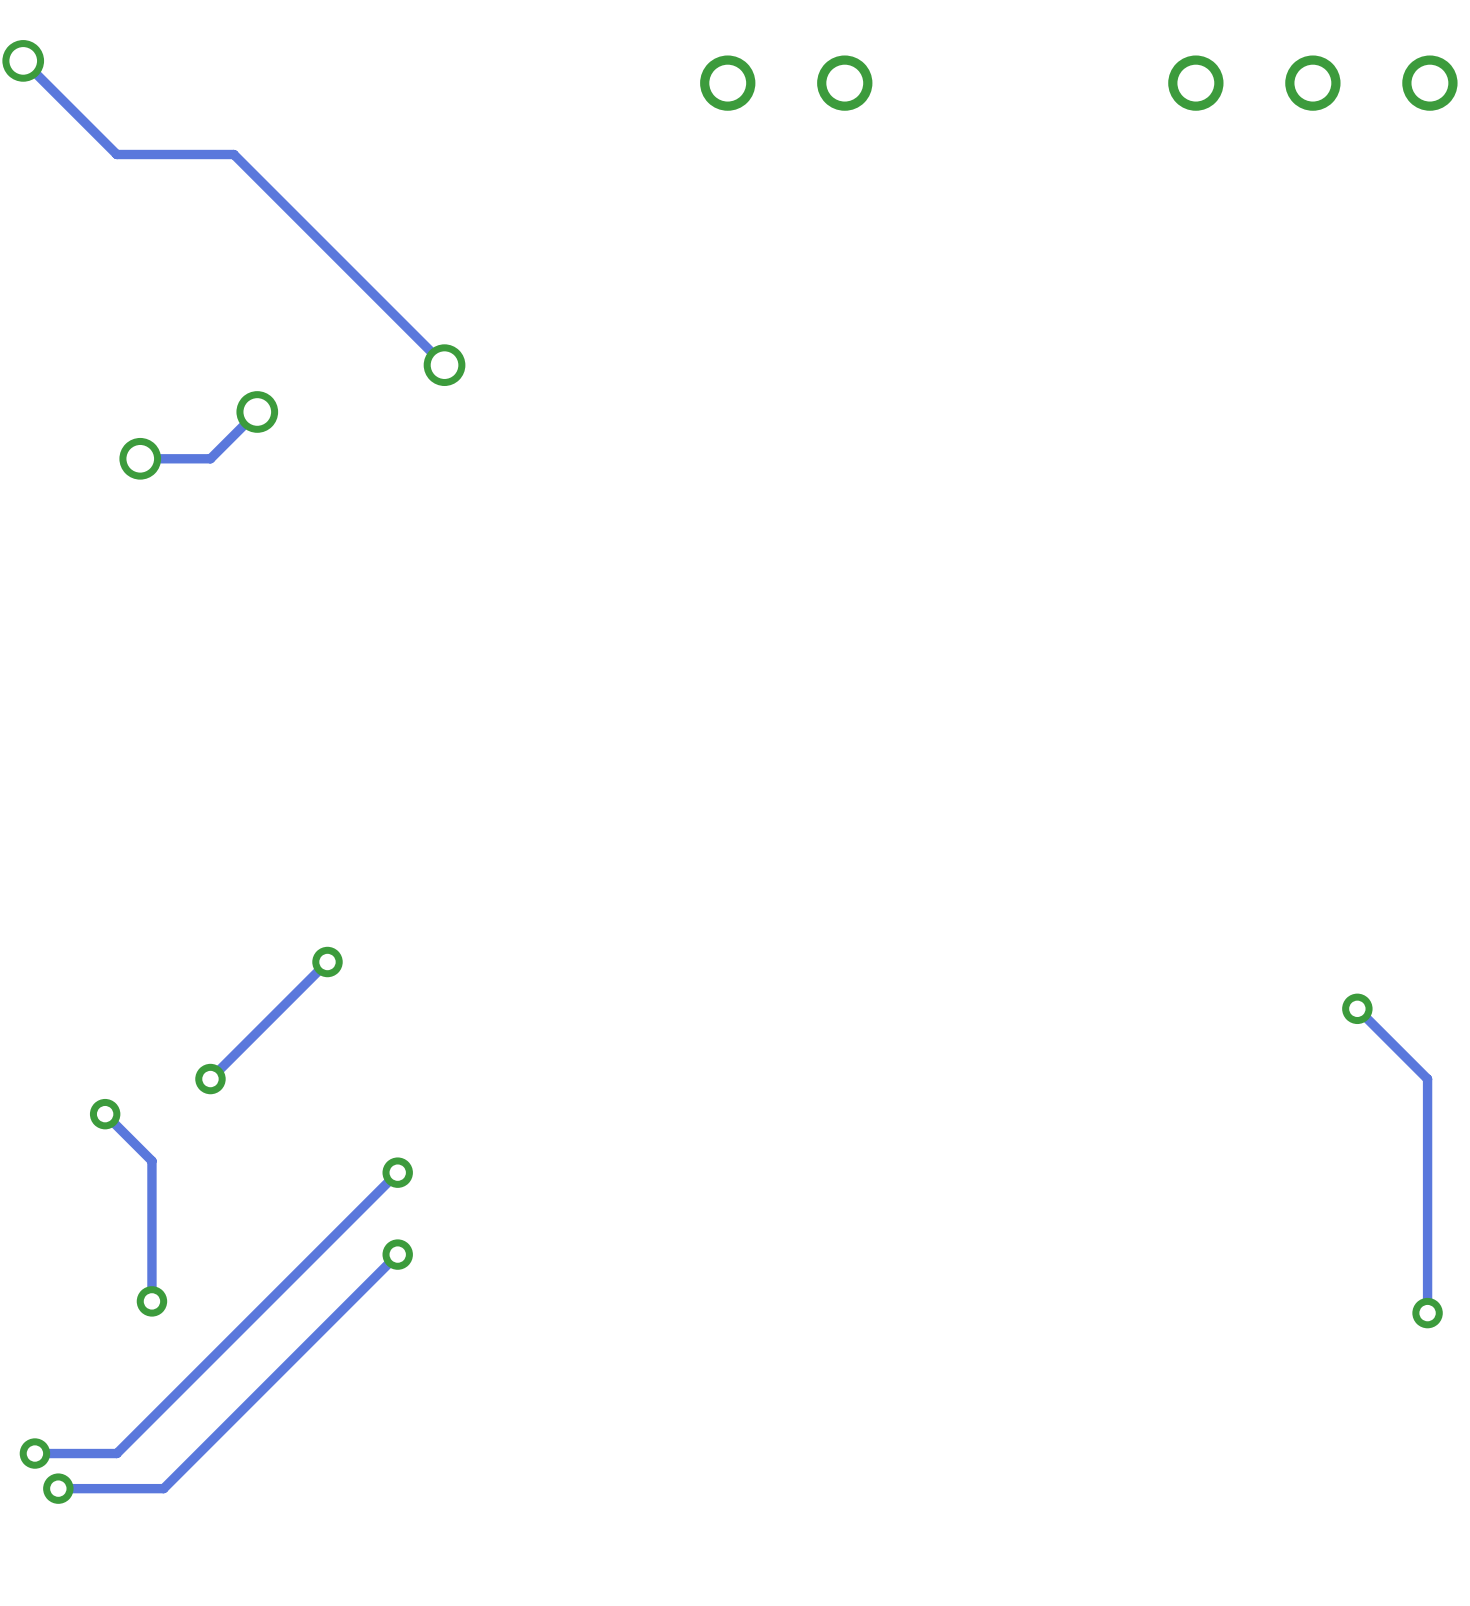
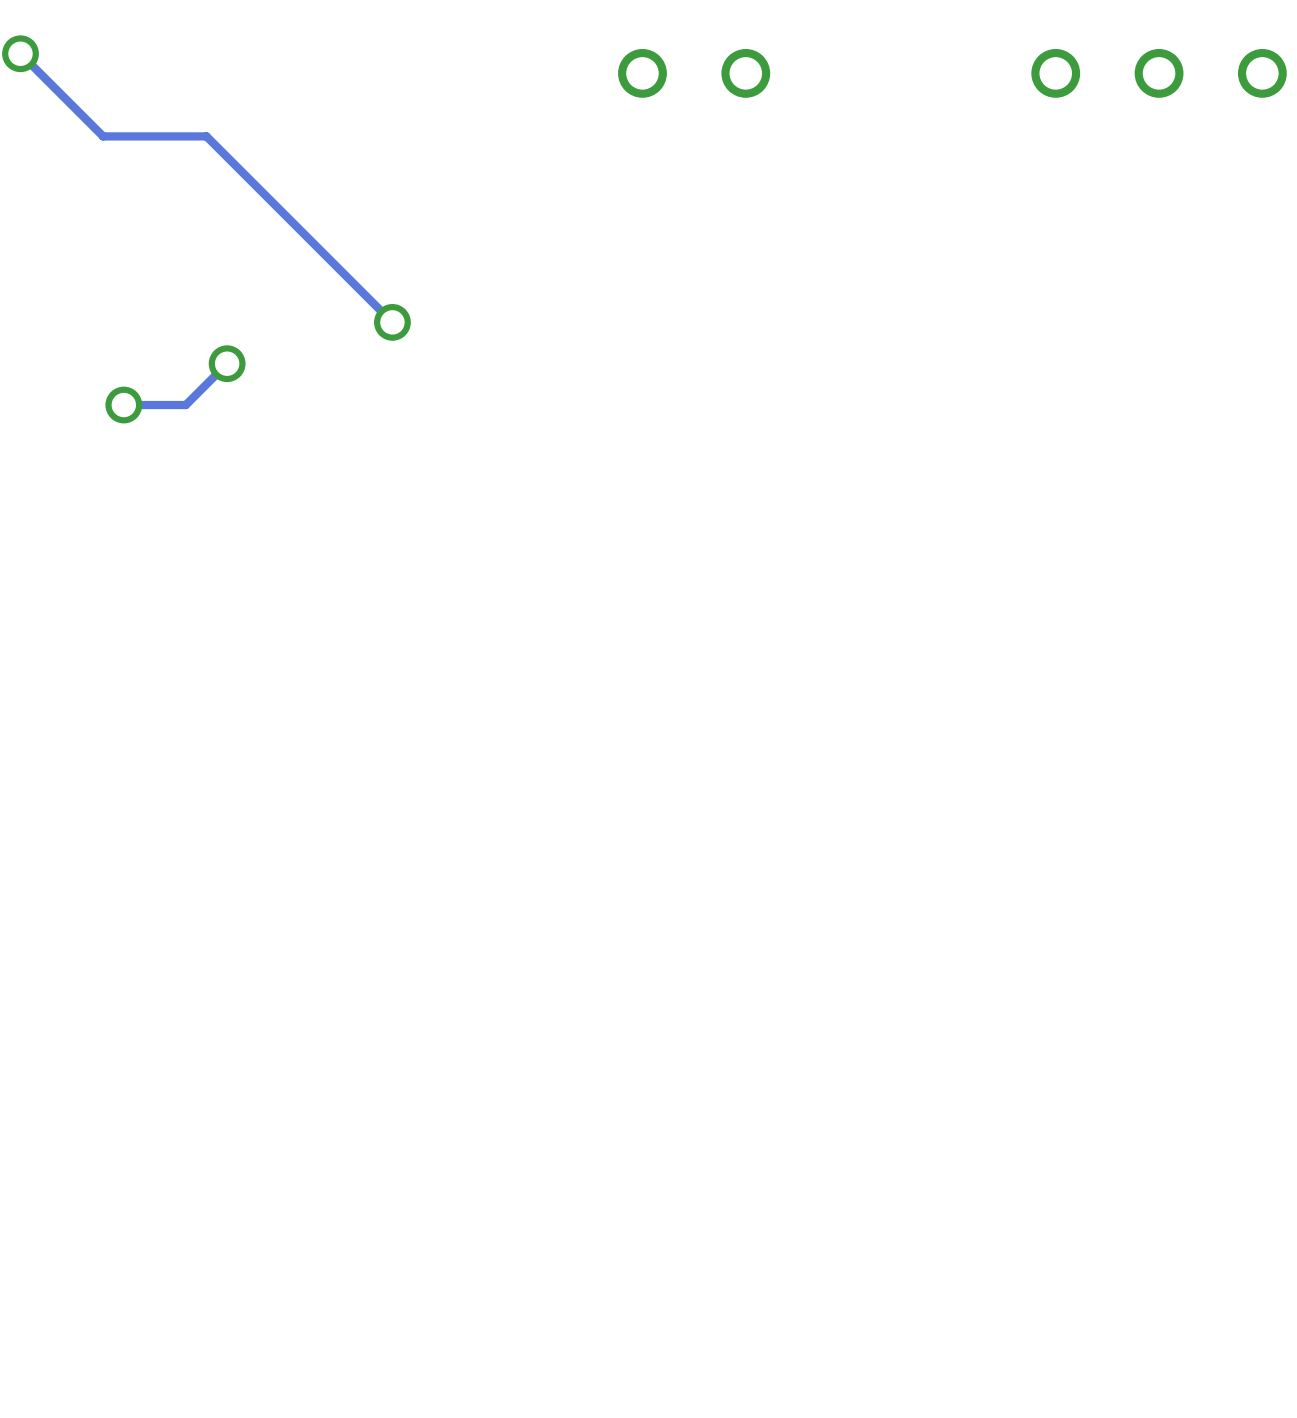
track: (327, 962) (210, 1079) -> none
via: (327, 962) -> none
track: (1357, 1008) (1427, 1079) (1427, 1313) -> none
via: (1357, 1008) -> none
via: (210, 1079) -> none
track: (105, 1114) (151, 1160) (151, 1301) -> none
via: (105, 1114) -> none
track: (397, 1172) (116, 1453) (34, 1453) -> none
via: (397, 1172) -> none
track: (397, 1254) (163, 1488) (58, 1488) -> none
via: (397, 1254) -> none
via: (151, 1301) -> none
via: (1427, 1313) -> none
via: (34, 1453) -> none
via: (58, 1488) -> none

